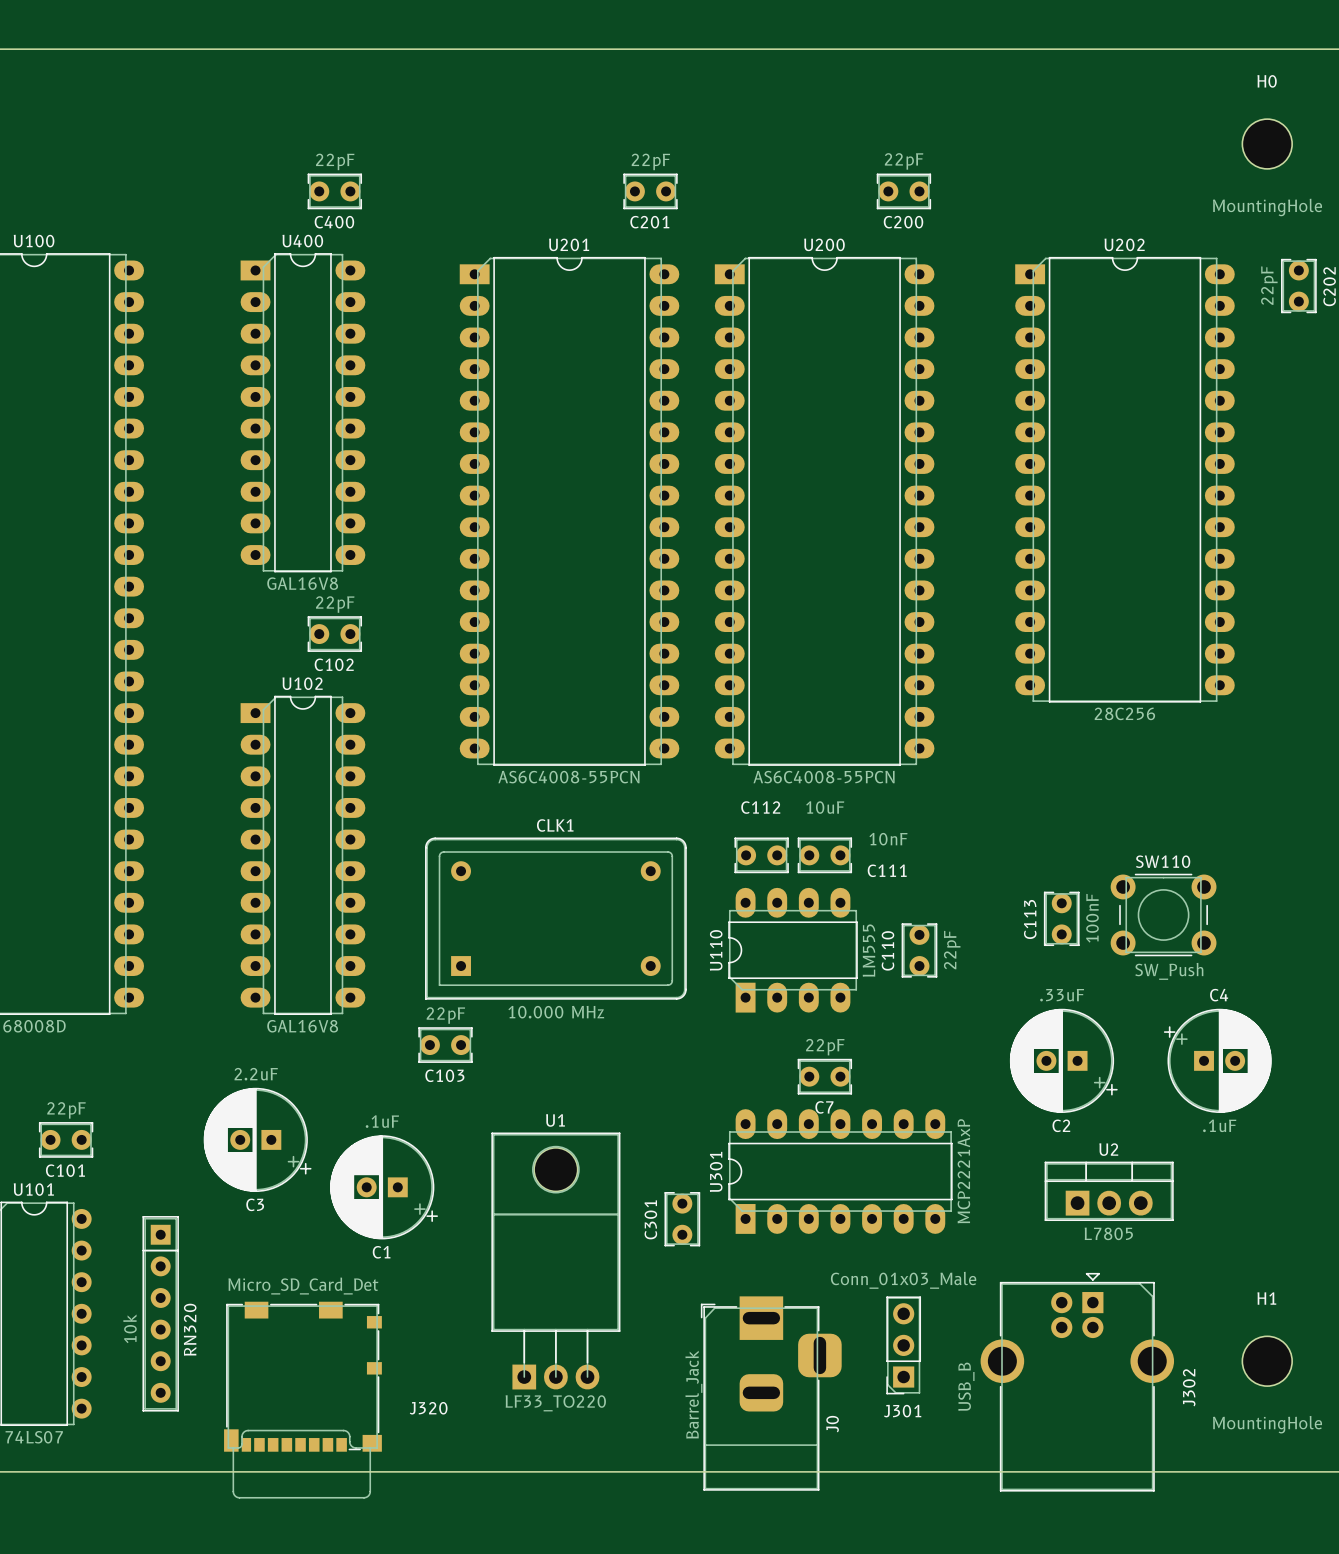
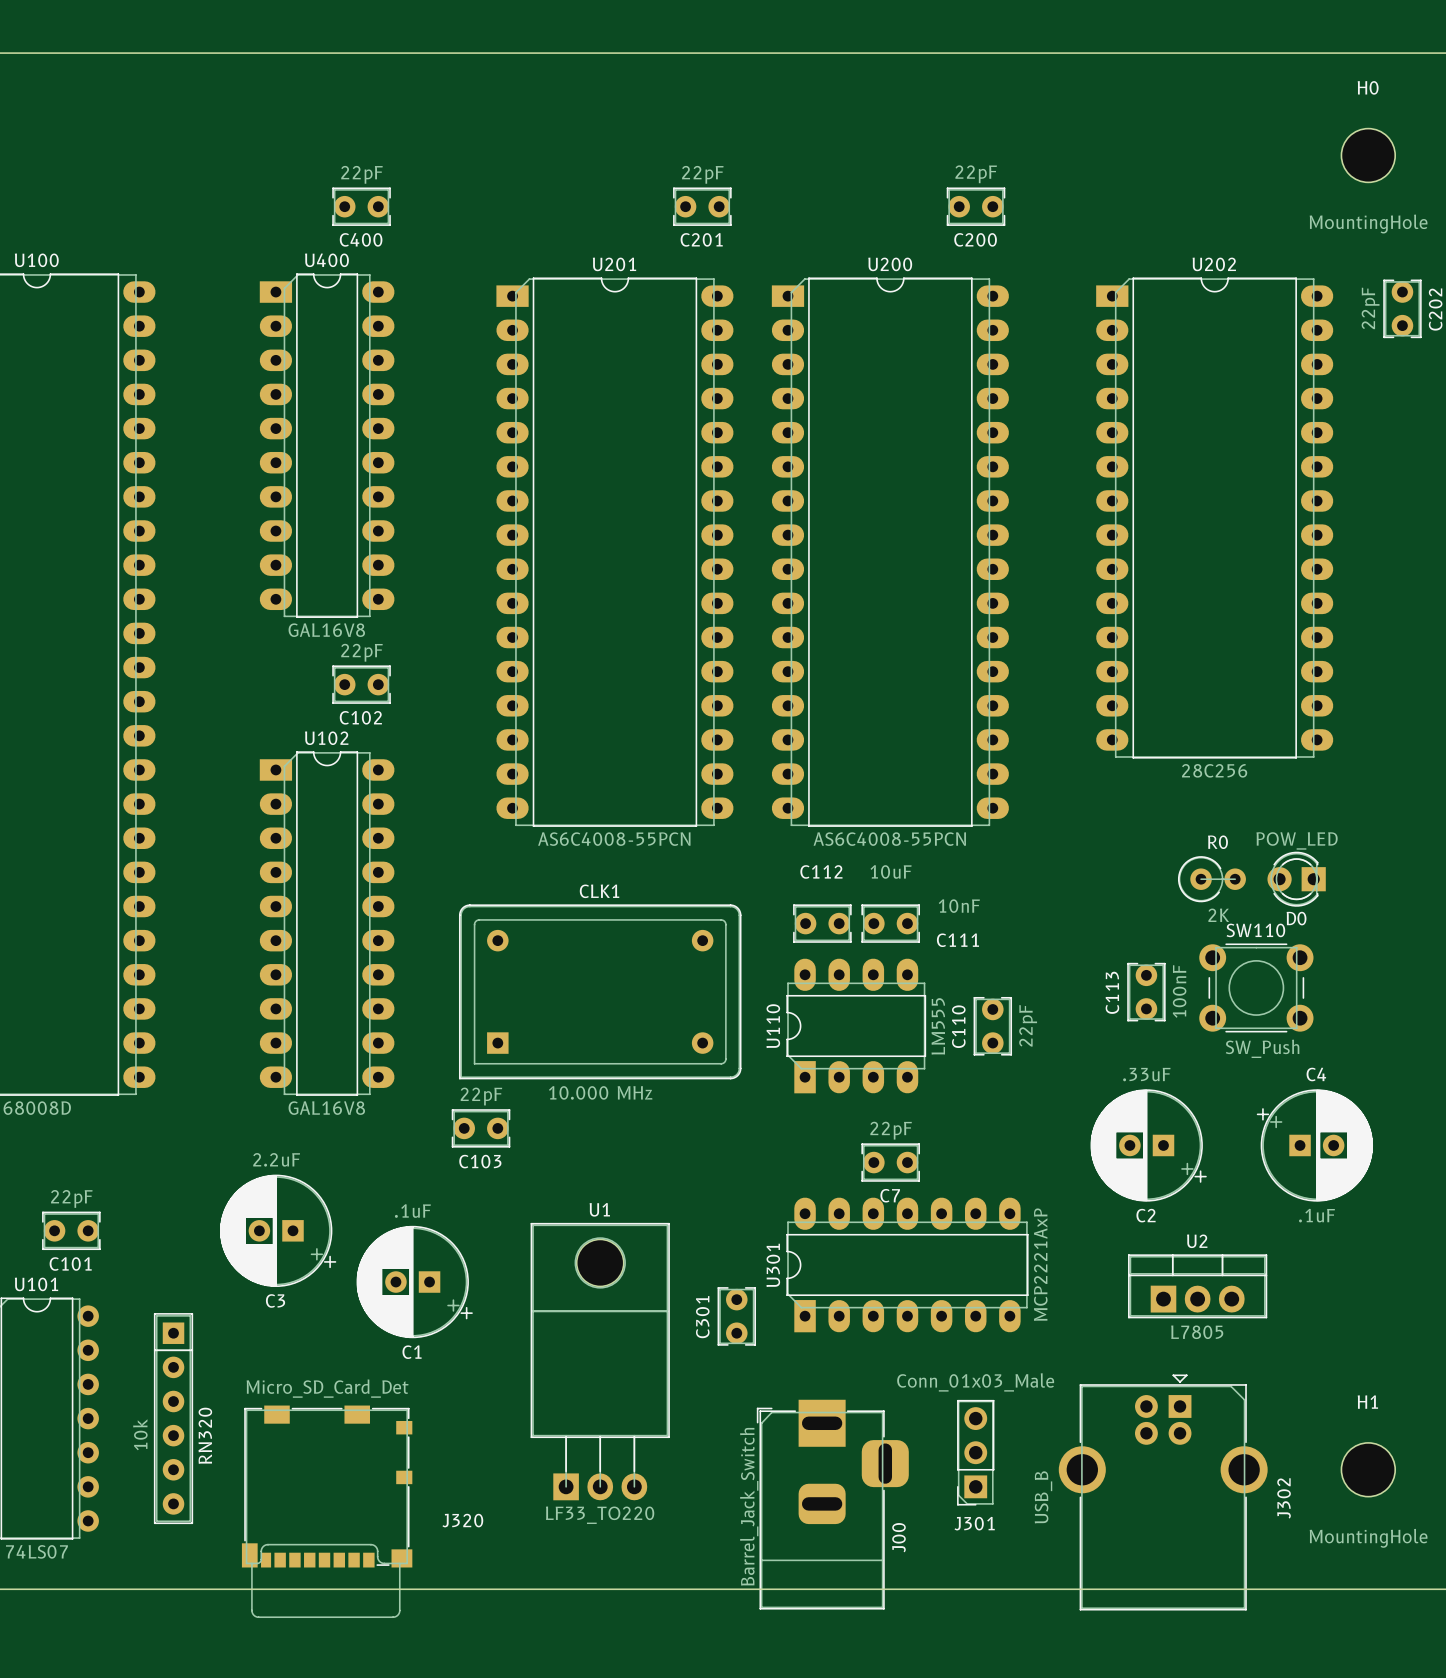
R0: none -> 2K (1211, 879)
D0: none -> POW_LED (1296, 879)
J0 value: Barrel_Jack (693, 1394) -> Barrel_Jack_Switch (749, 1506)
J0 name: J0 (832, 1424) -> J00 (898, 1537)

